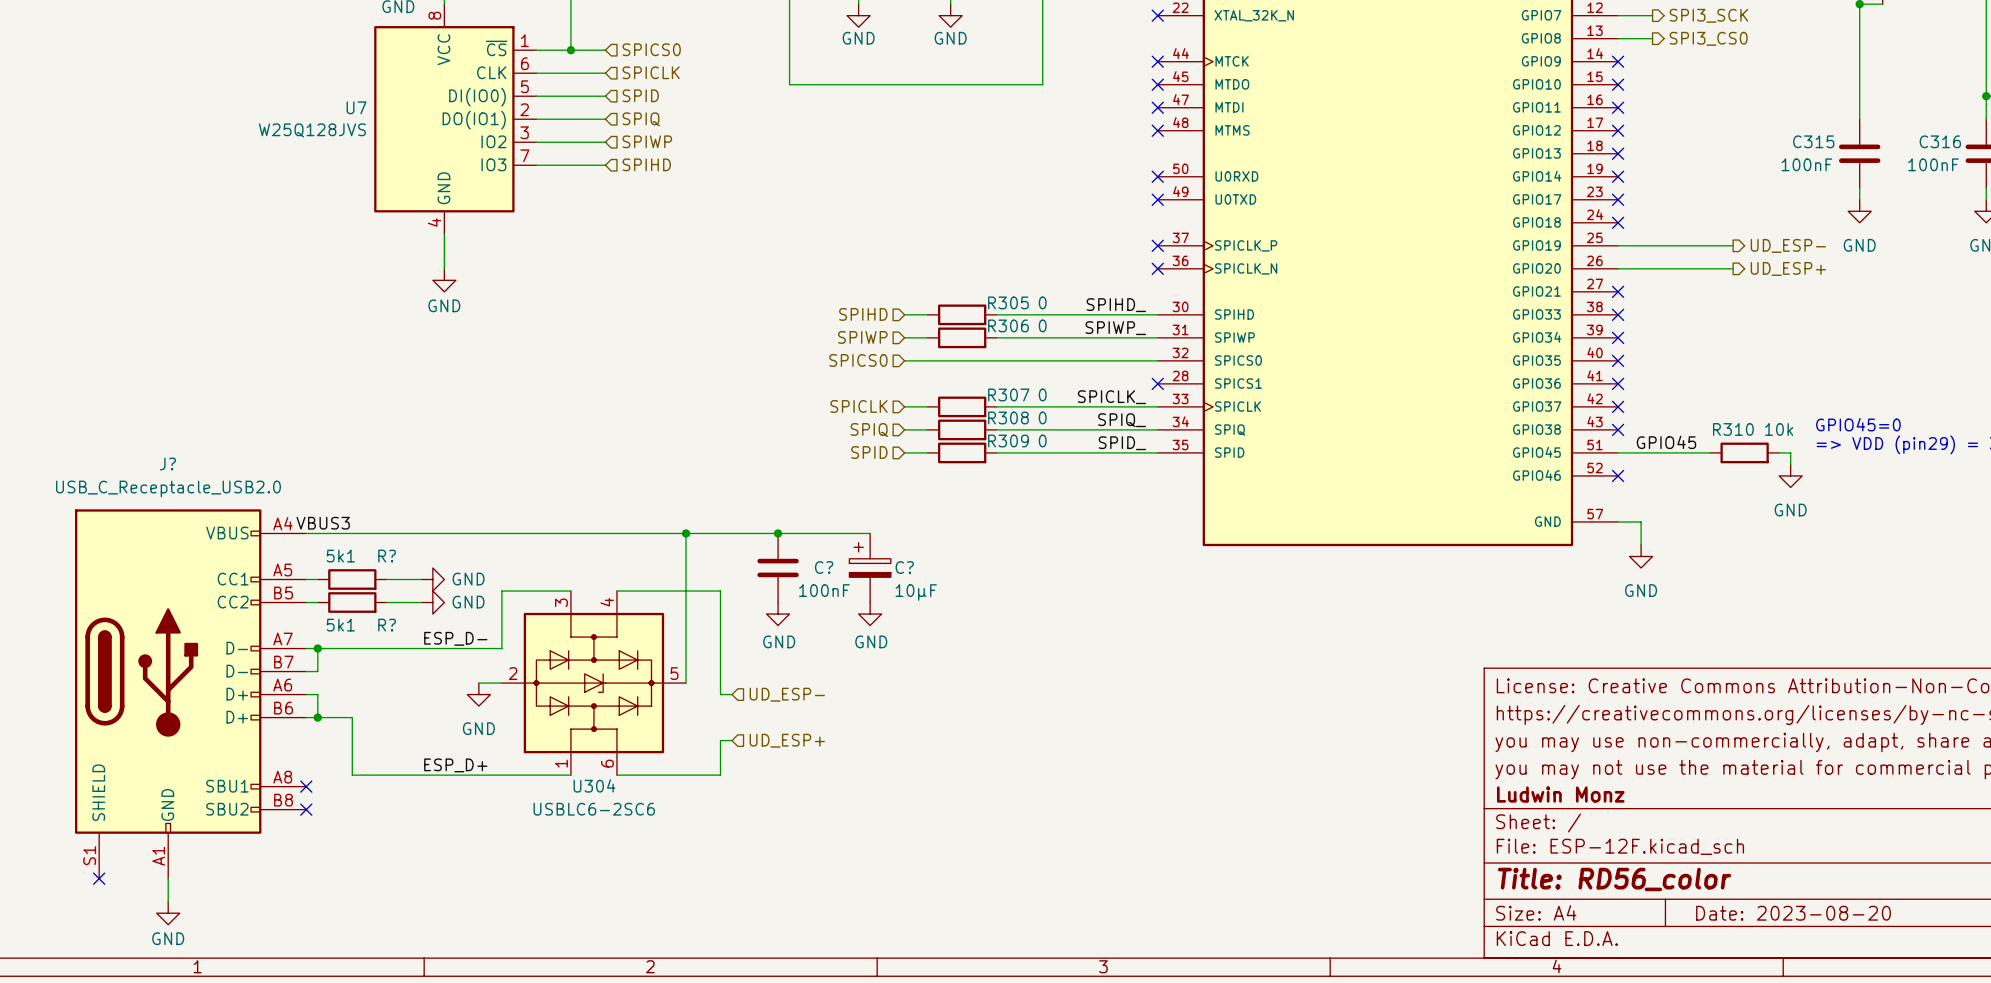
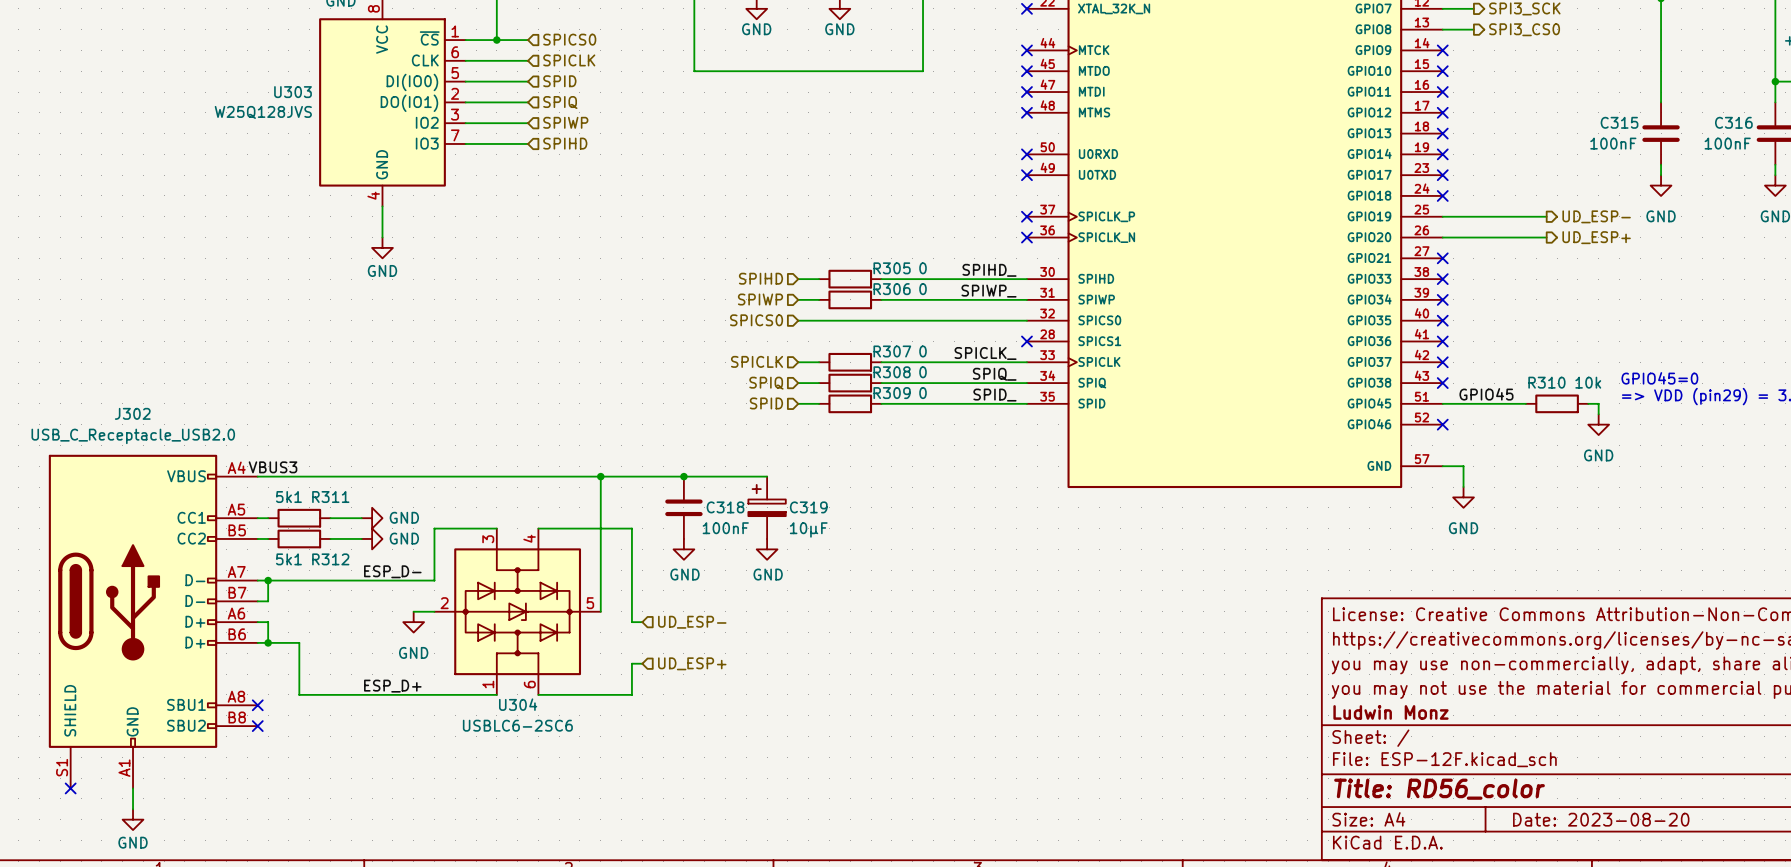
U7 name: U7 (356, 107) -> U303 (293, 92)
J? name: J? (167, 464) -> J302 (132, 413)
R? name: R? (387, 556) -> R311 (330, 497)
C? name: C? (824, 567) -> C318 (725, 507)
C? name: C? (904, 567) -> C319 (808, 507)
R? name: R? (387, 625) -> R312 (330, 559)

